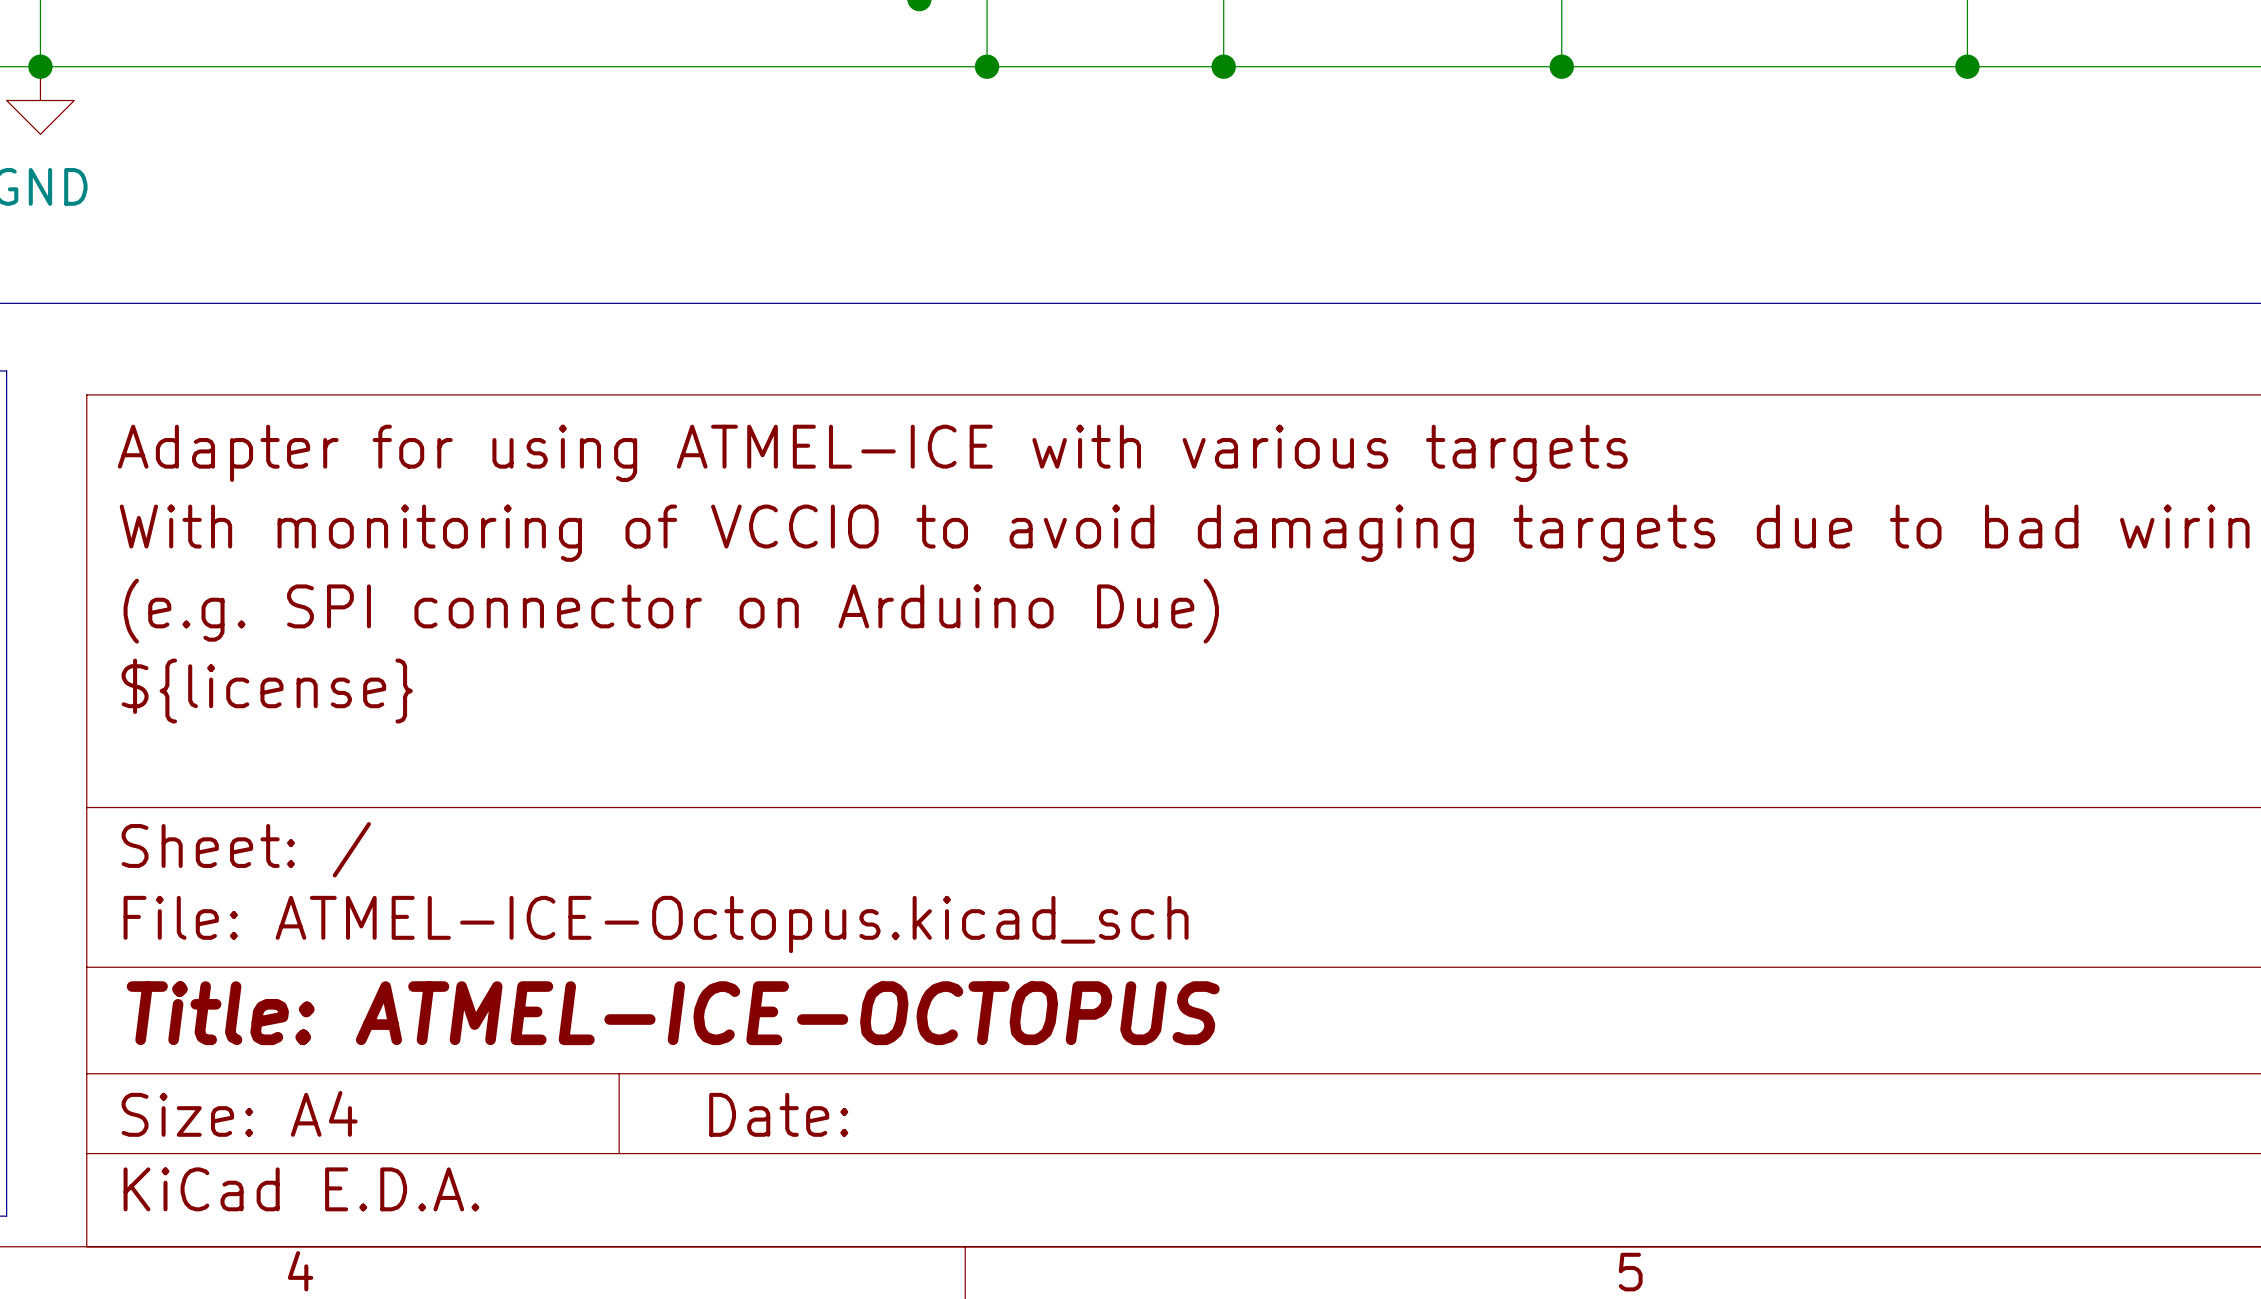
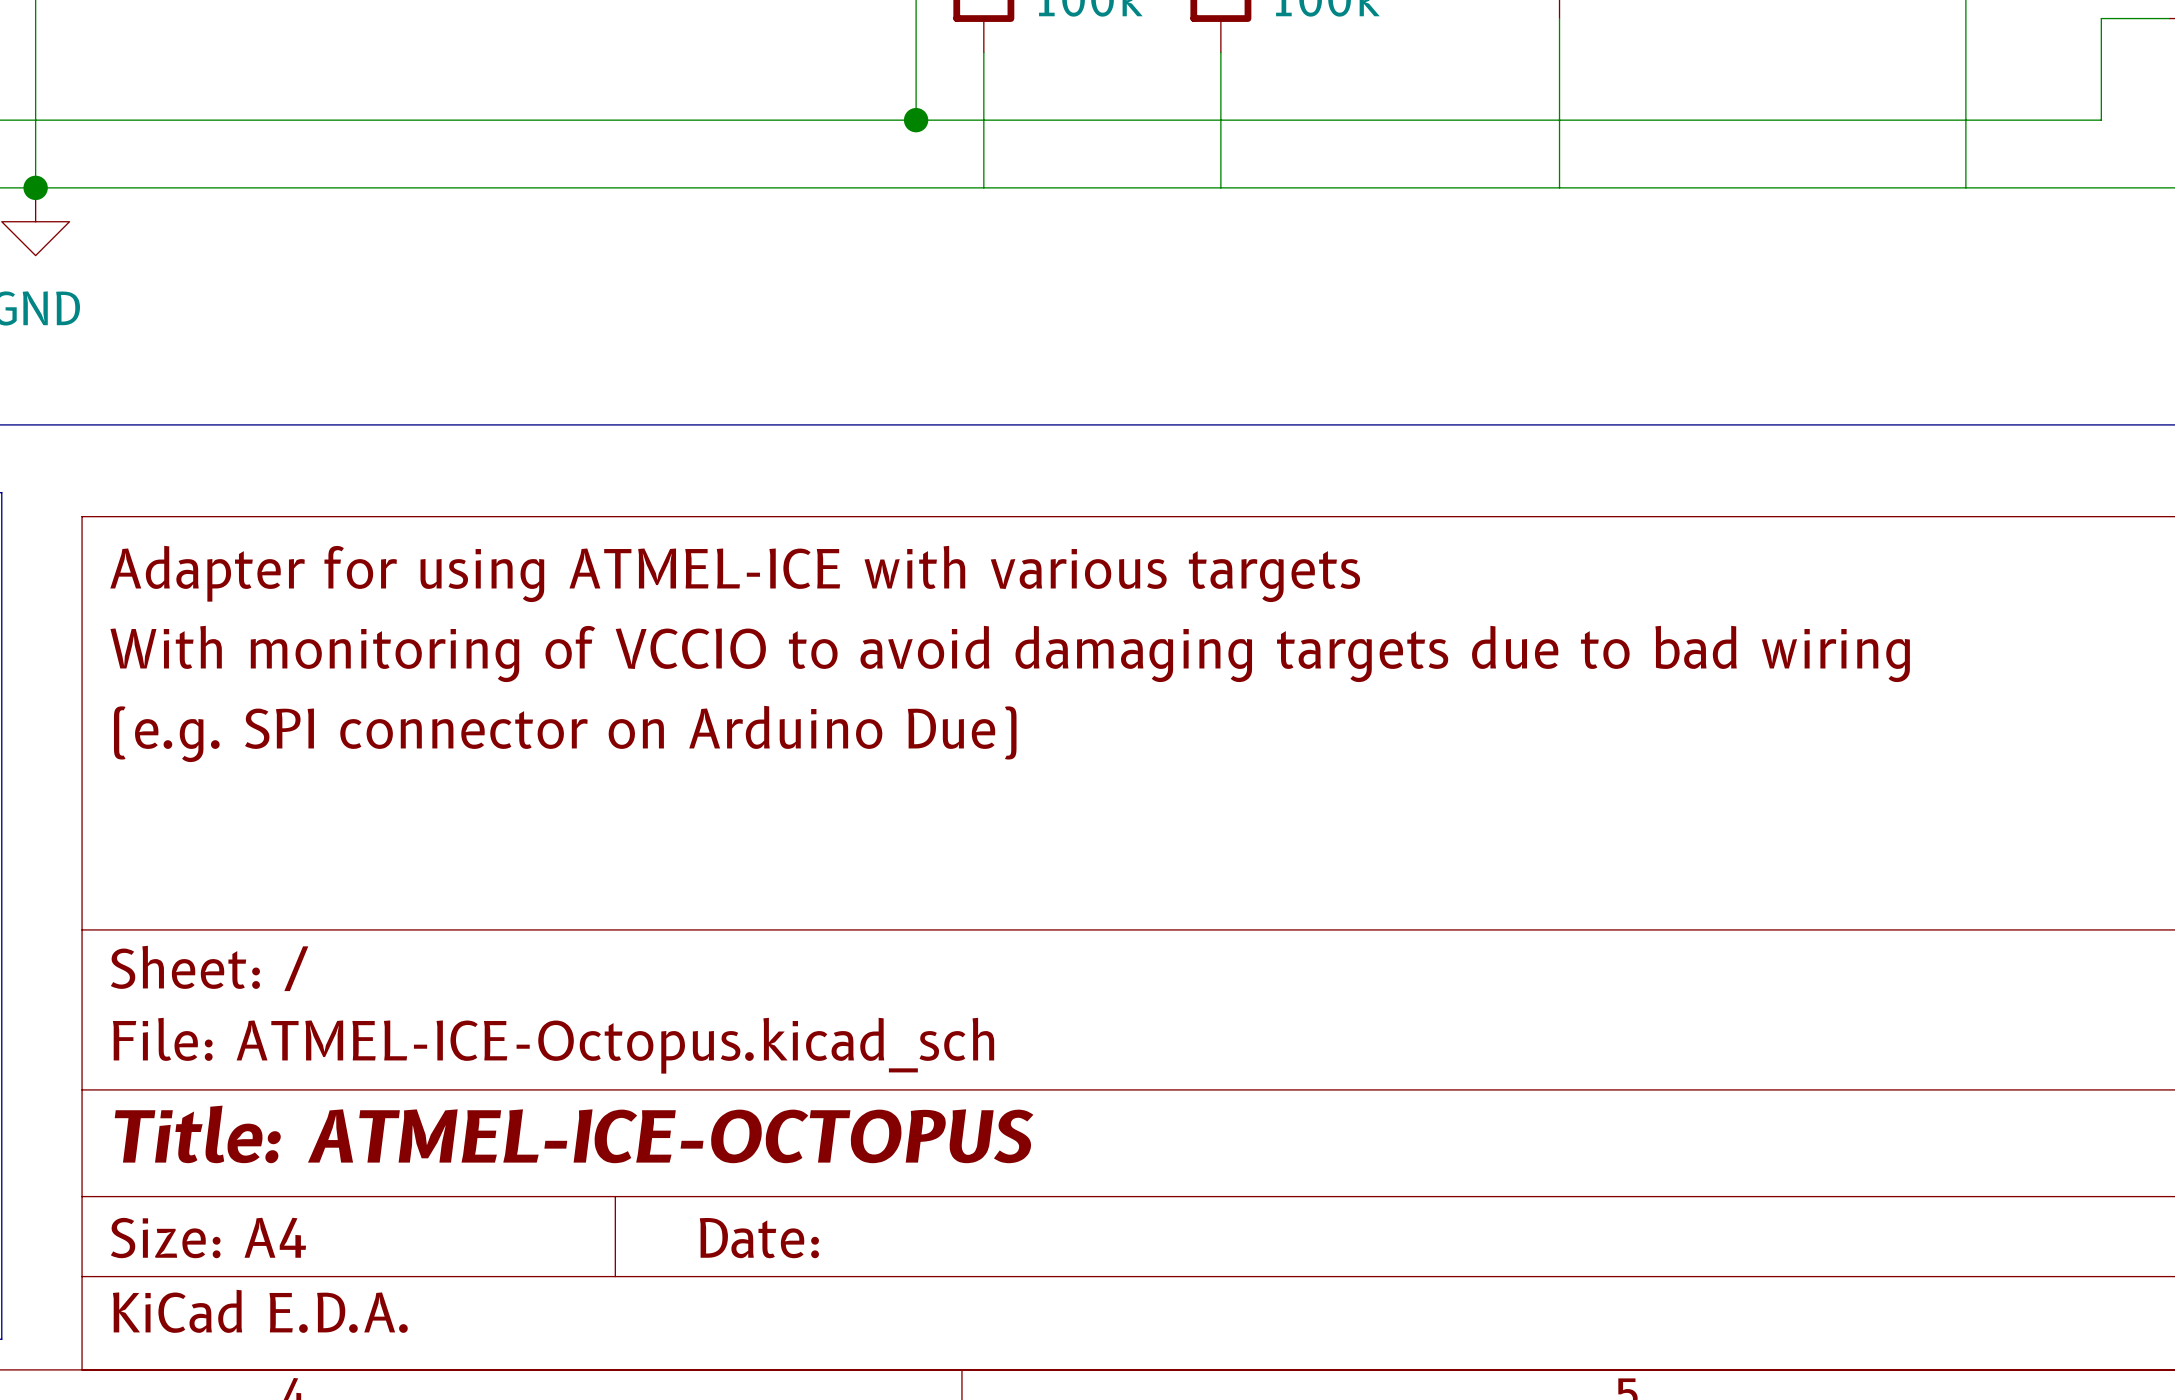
junction: (987, 66) -> none
junction: (1223, 66) -> none
junction: (1561, 66) -> none
junction: (1967, 66) -> none
title block: ${license} (267, 691) -> none

